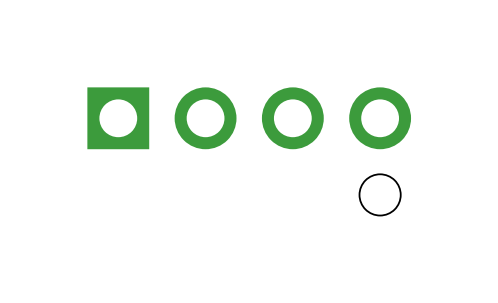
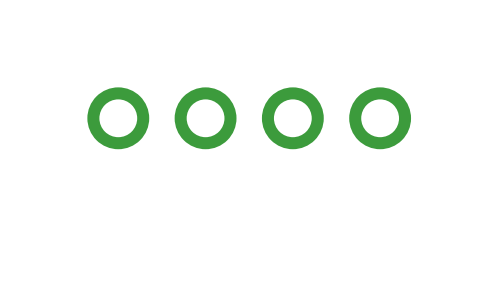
part footprint: [87, 87, 412, 216] -> [87, 87, 412, 150]

